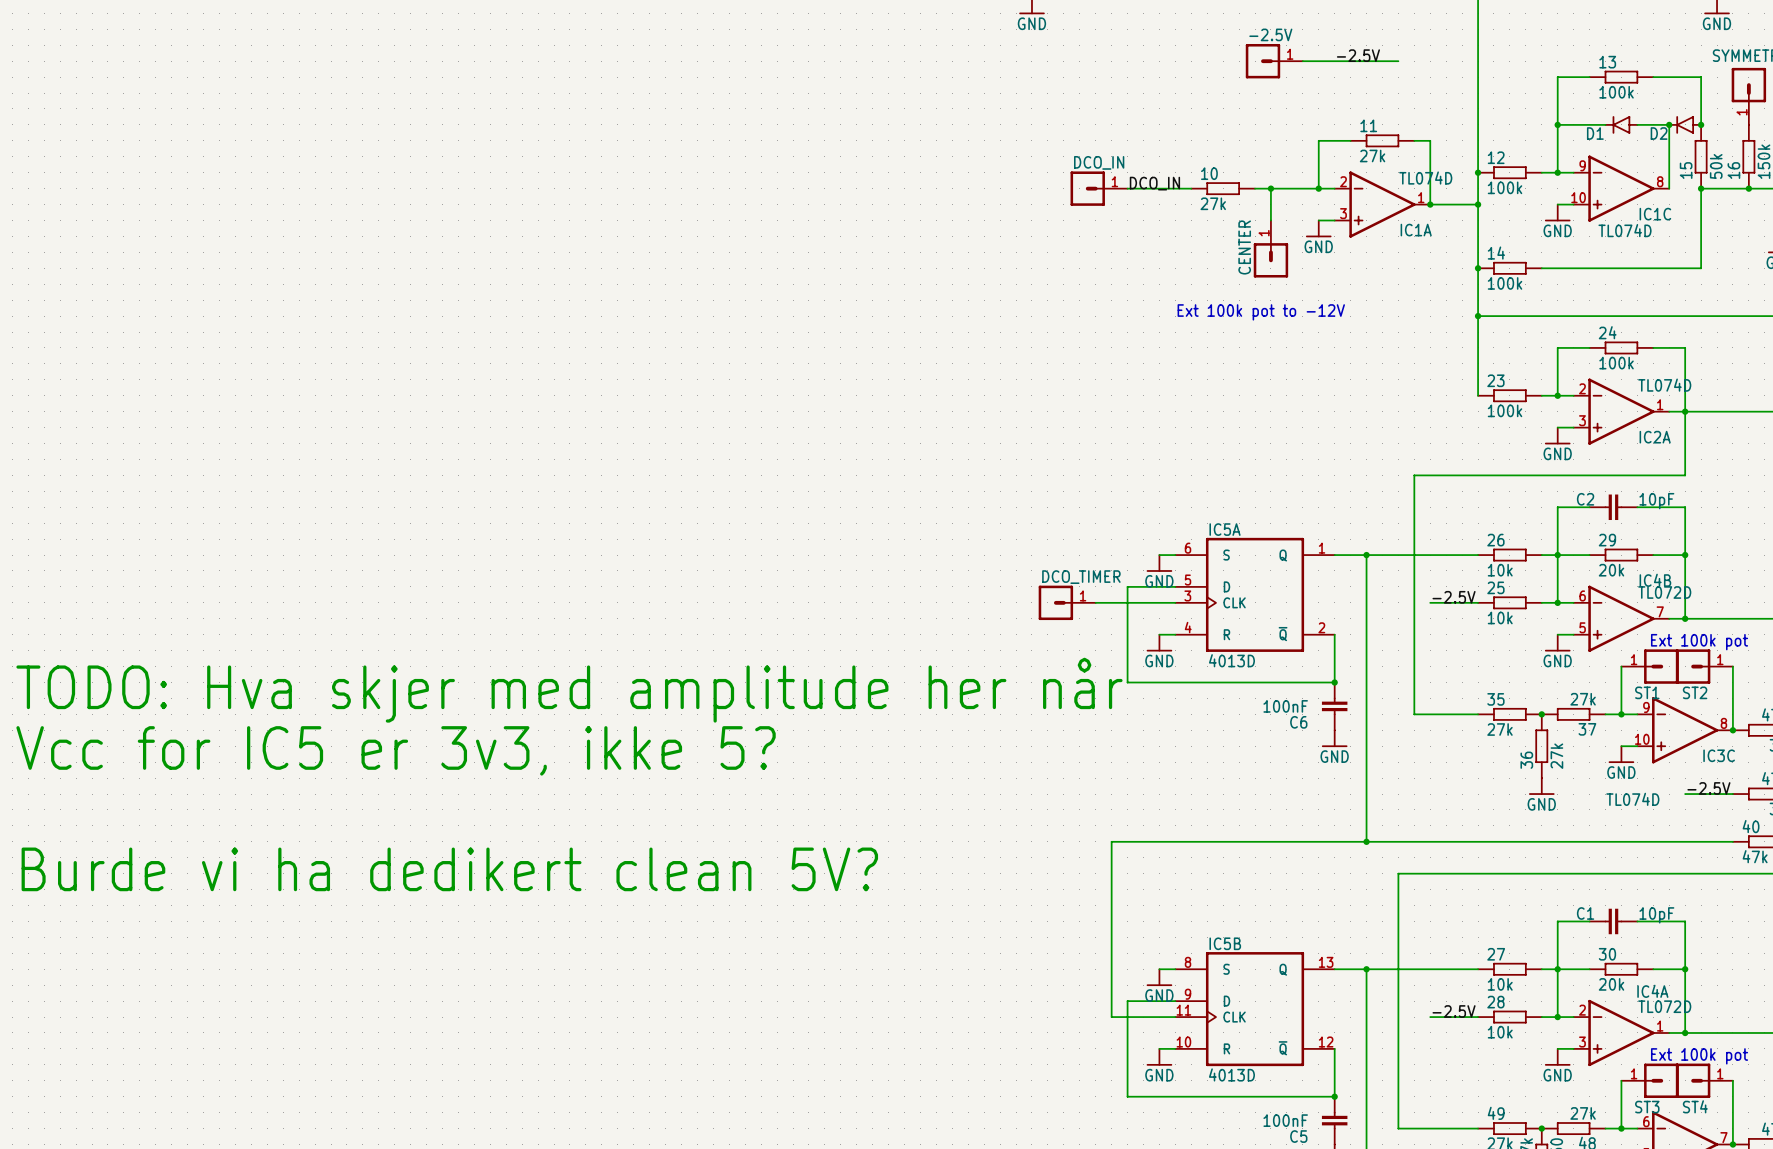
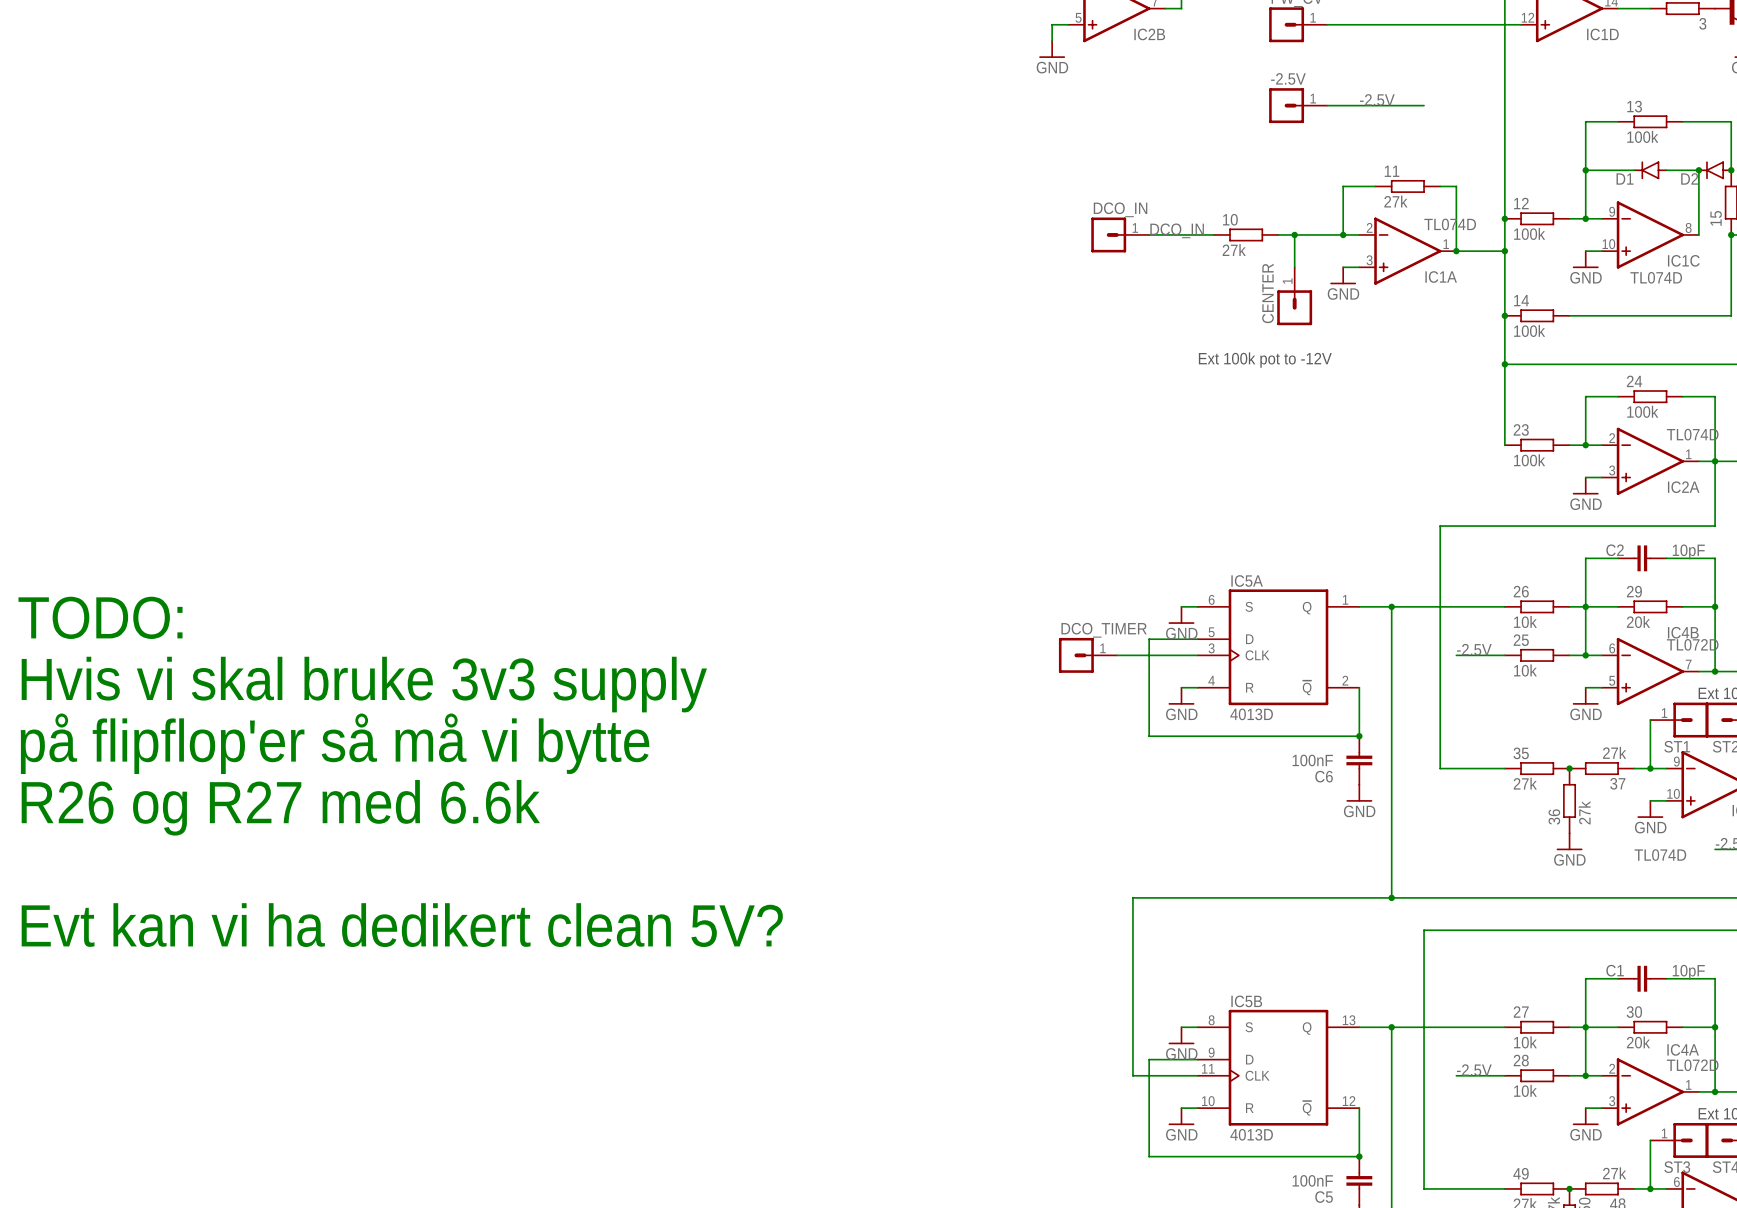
text: none -> TODO: (100, 617)
text: none -> Hvis vi skal bruke 3v3 supply (364, 684)
text: TODO: Hva skjer med amplitude her når (569, 690) -> på flipflop'er så må vi bytte (335, 743)
text: Vcc for IC5 er 3v3, ikke 5? (396, 750) -> R26 og R27 med 6.6k (280, 807)
text: Burde vi ha dedikert clean 5V? (449, 869) -> Evt kan vi ha dedikert clean 5V? (402, 925)

